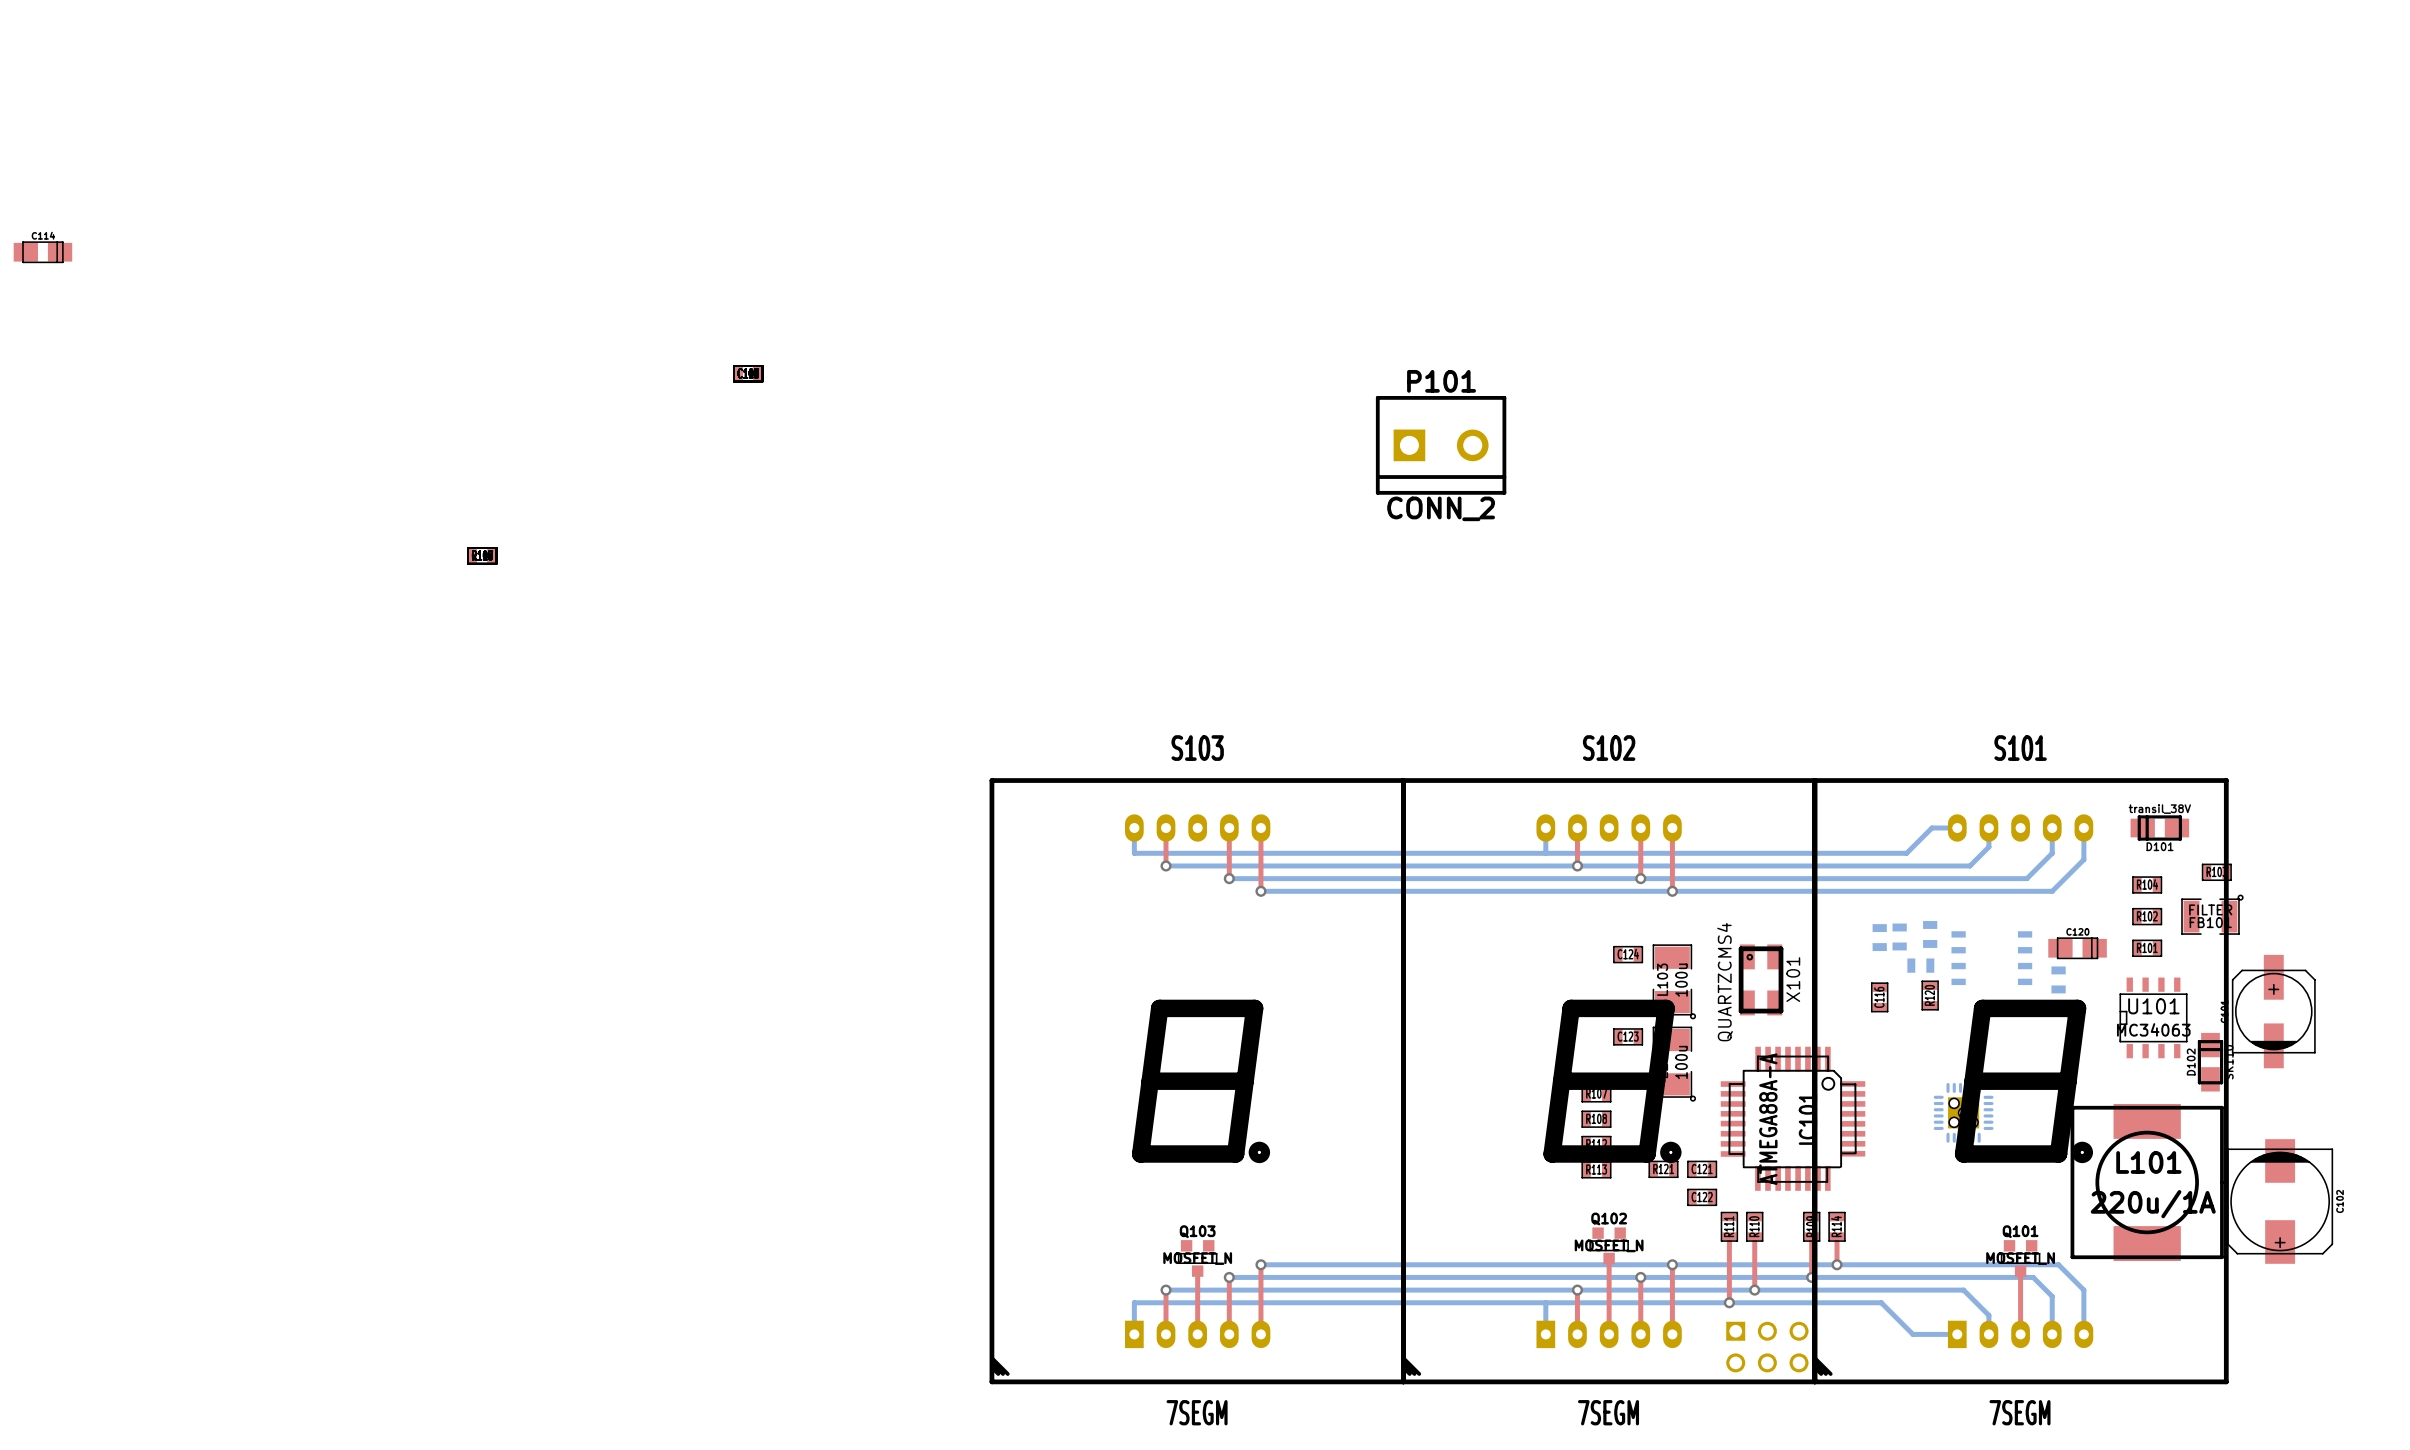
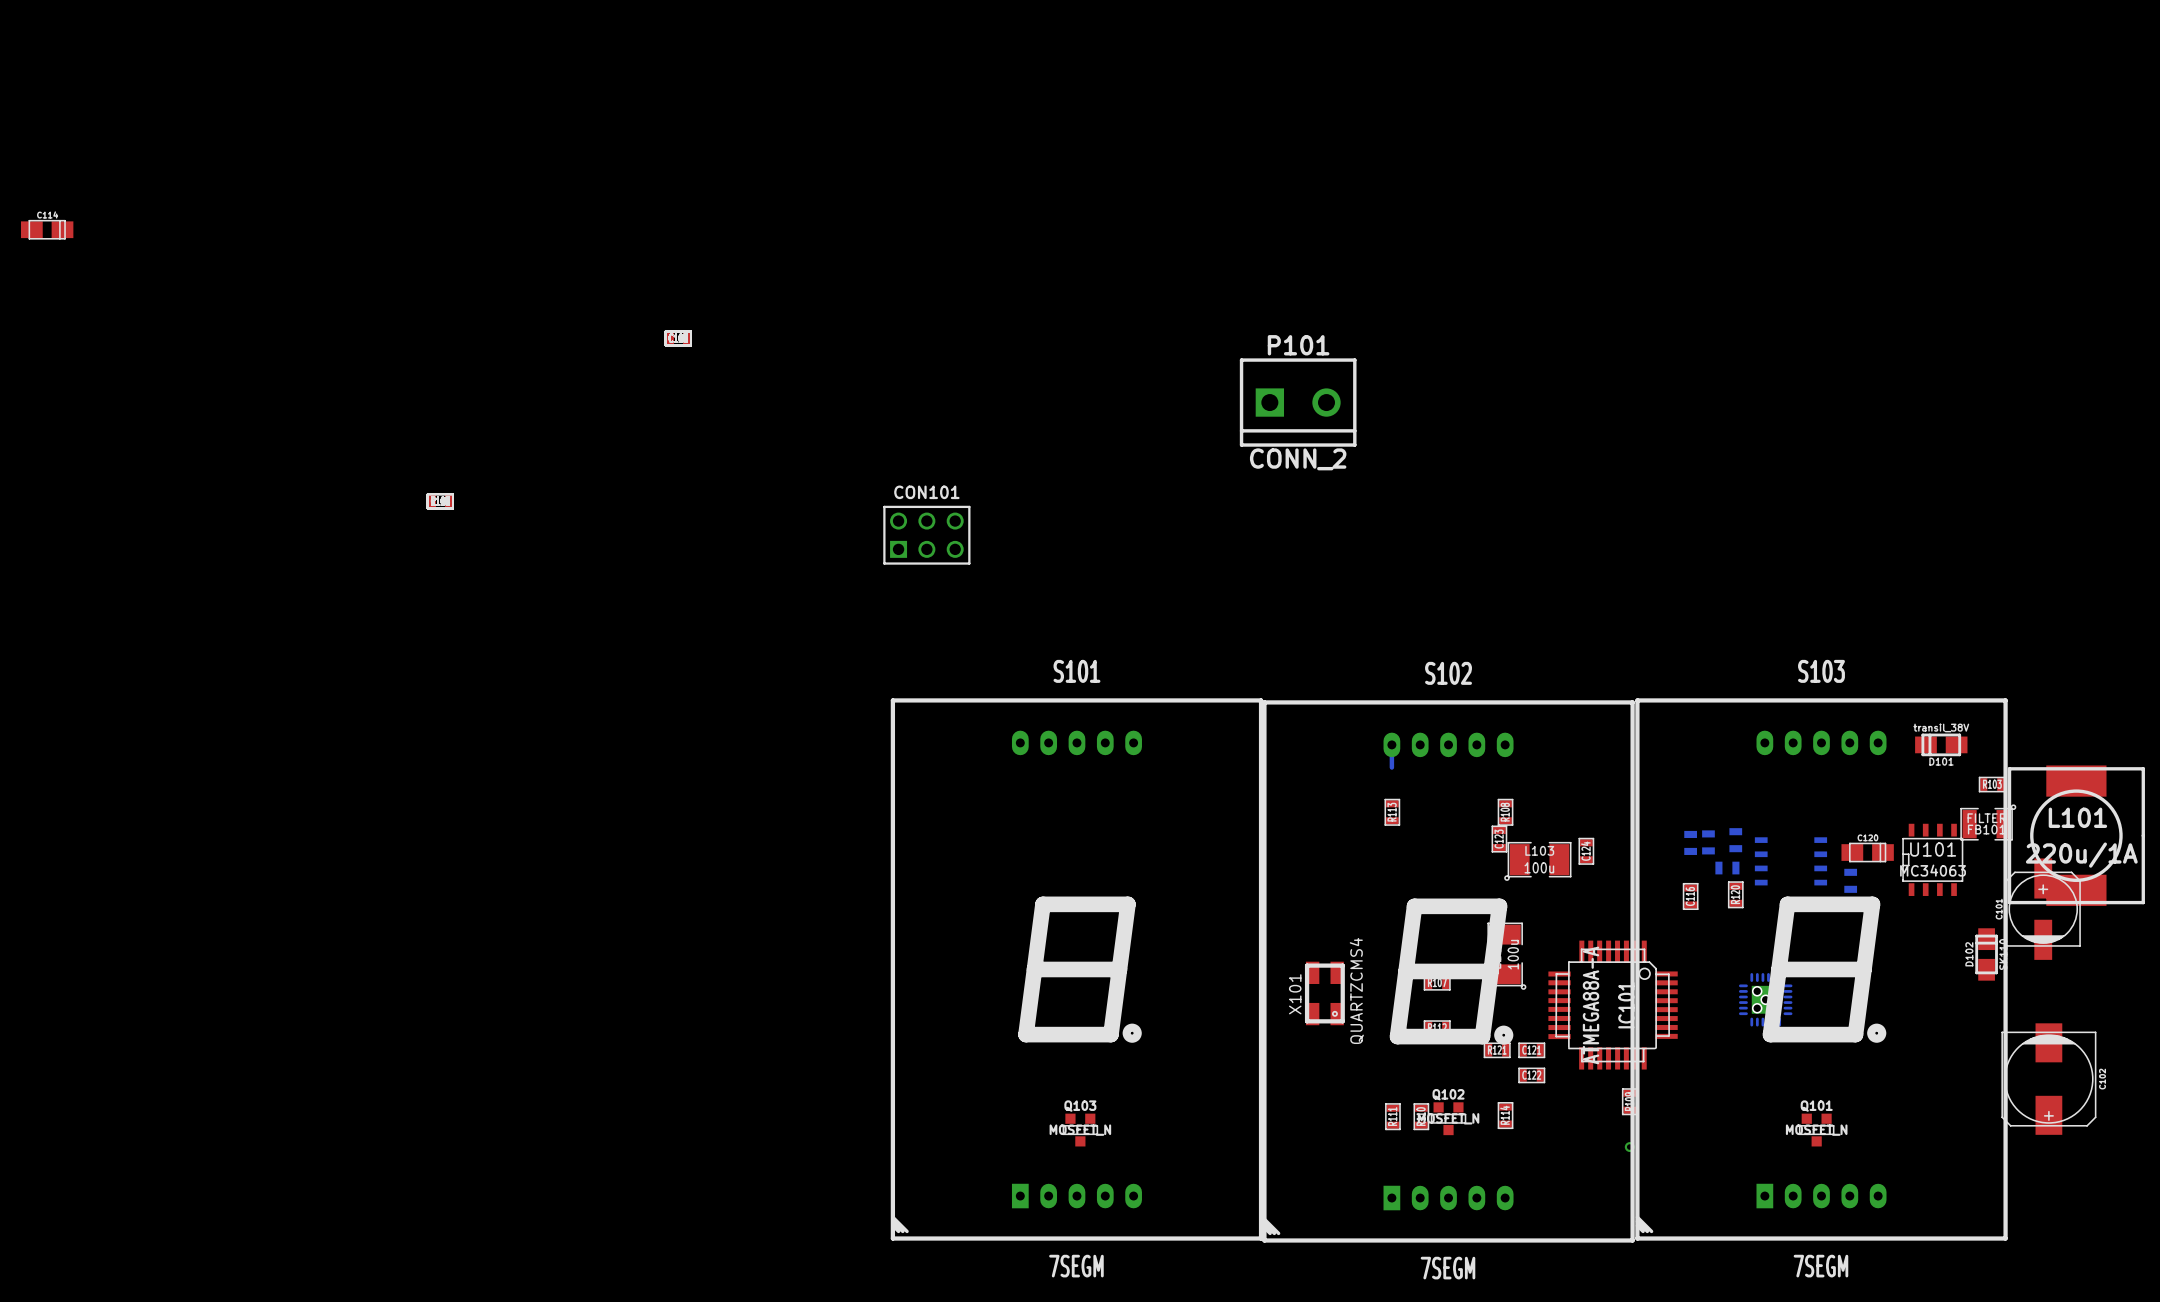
CON101: none -> (926, 535)
bottom track: (1134, 828) (1134, 853) (1906, 853) (1931, 828) (1957, 828) -> none
top track: (1166, 828) (1166, 865) -> none
top track: (1229, 828) (1229, 878) -> none
top track: (1260, 828) (1260, 891) -> none
top track: (1577, 828) (1577, 865) -> none
top track: (1640, 828) (1640, 878) -> none
top track: (1672, 828) (1672, 891) -> none
bottom track: (1988, 828) (1988, 846) (1969, 865) (1166, 865) -> none
bottom track: (2052, 828) (2052, 853) (2026, 878) (1229, 878) -> none
bottom track: (2083, 828) (2083, 859) (2052, 891) (1260, 891) -> none
via: (1166, 865) -> none
via: (1577, 865) -> none
via: (1229, 878) -> none
via: (1640, 878) -> none
R104 position: (2147, 884) -> (440, 501)
via: (1260, 891) -> none
via: (1672, 891) -> none
R102 position: (2147, 916) -> (440, 501)
R101 position: (2147, 948) -> (440, 501)
C124 rotation: 0° (1628, 954) -> 90° clockwise (1586, 851)
C124 position: (1628, 954) -> (1586, 851)
X101 rotation: 0° (1761, 979) -> 180° (1324, 993)
X101 position: (1761, 979) -> (1324, 993)
L103 rotation: 0° (1674, 981) -> 90° clockwise (1537, 861)
U101 position: (2153, 1017) -> (1932, 859)
C123 rotation: 0° (1628, 1036) -> 90° clockwise (1499, 839)
C123 position: (1628, 1036) -> (1499, 839)
S103 position: (1197, 1081) -> (1821, 969)
S101 position: (2020, 1081) -> (1076, 969)
R108 rotation: 0° (1596, 1119) -> 90° clockwise (1505, 812)
R108 position: (1596, 1119) -> (1505, 812)
R113 rotation: 0° (1596, 1169) -> 90° clockwise (1392, 812)
R113 position: (1596, 1169) -> (1392, 812)
L101 position: (2147, 1182) -> (2076, 835)
R111 position: (1729, 1226) -> (1392, 1116)
R110 position: (1754, 1226) -> (1421, 1116)
R114 position: (1837, 1226) -> (1505, 1115)
top track: (1729, 1236) (1729, 1302) -> none
top track: (1754, 1236) (1754, 1290) -> none
top track: (1811, 1236) (1811, 1277) -> none
top track: (1837, 1236) (1837, 1264) -> none
top track: (1609, 1258) (1609, 1334) -> none
top track: (1260, 1264) (1260, 1334) -> none
bottom track: (1260, 1264) (2058, 1264) (2083, 1290) (2083, 1334) -> none
via: (1260, 1264) -> none
top track: (1672, 1264) (1672, 1334) -> none
via: (1672, 1264) -> none
via: (1837, 1264) -> none
top track: (1197, 1271) (1197, 1334) -> none
top track: (2020, 1271) (2020, 1334) -> none
top track: (1229, 1277) (1229, 1334) -> none
bottom track: (1229, 1277) (2033, 1277) (2052, 1296) (2052, 1334) -> none
via: (1229, 1277) -> none
top track: (1640, 1277) (1640, 1334) -> none
via: (1640, 1277) -> none
top track: (1166, 1290) (1166, 1334) -> none
bottom track: (1166, 1290) (1963, 1290) (1988, 1315) (1988, 1334) -> none
via: (1166, 1290) -> none
top track: (1577, 1290) (1577, 1334) -> none
via: (1577, 1290) -> none
via: (1754, 1290) -> none
bottom track: (1545, 1302) (1545, 1334) -> none
via: (1729, 1302) -> none
bottom track: (1134, 1334) (1134, 1302) (1881, 1302) (1912, 1334) (1957, 1334) -> none
part: (1767, 1347) -> none

